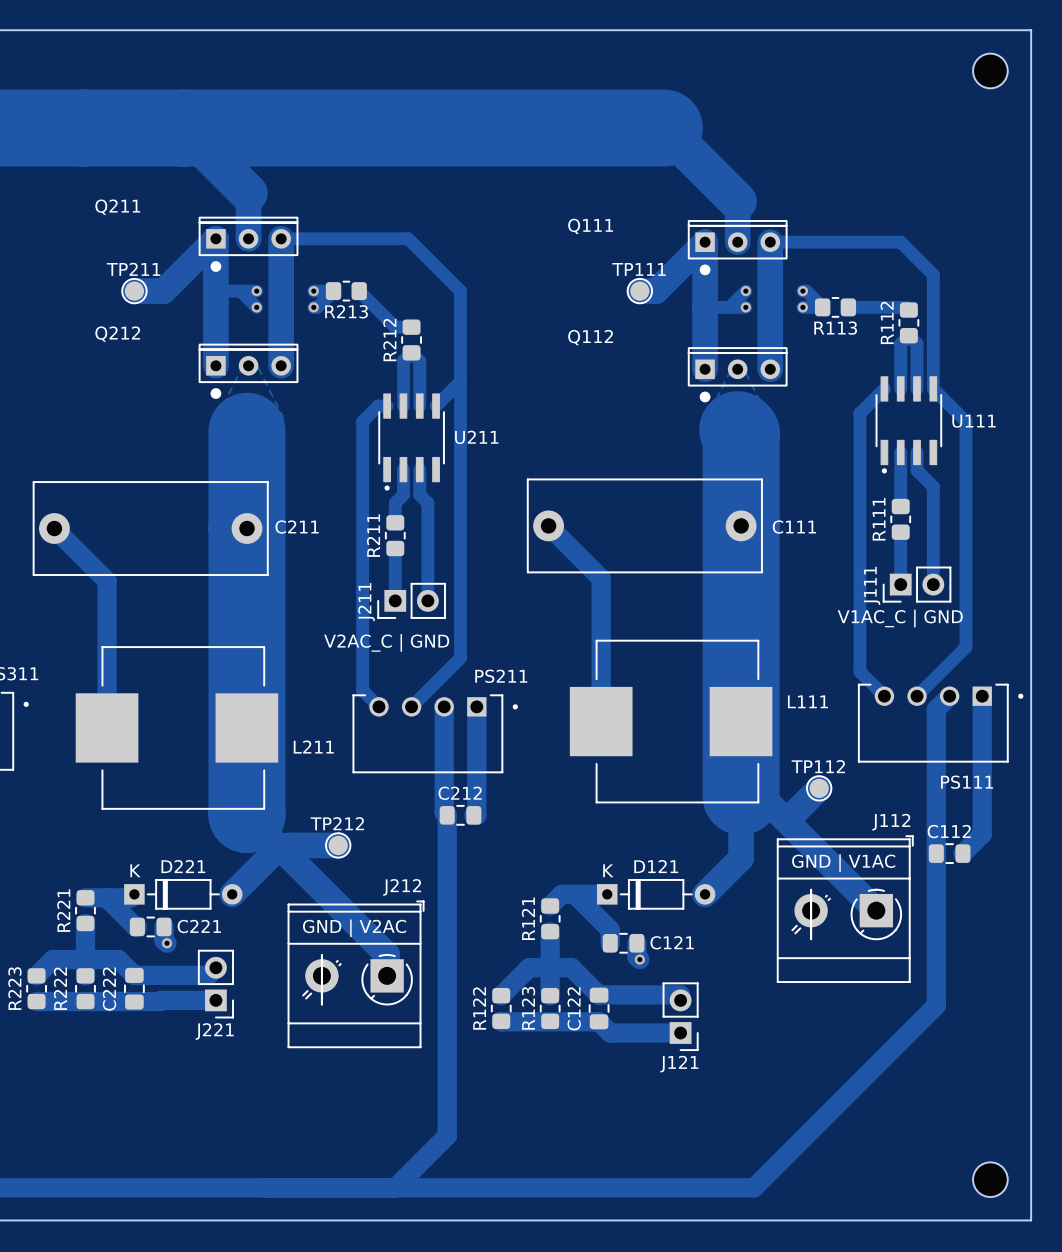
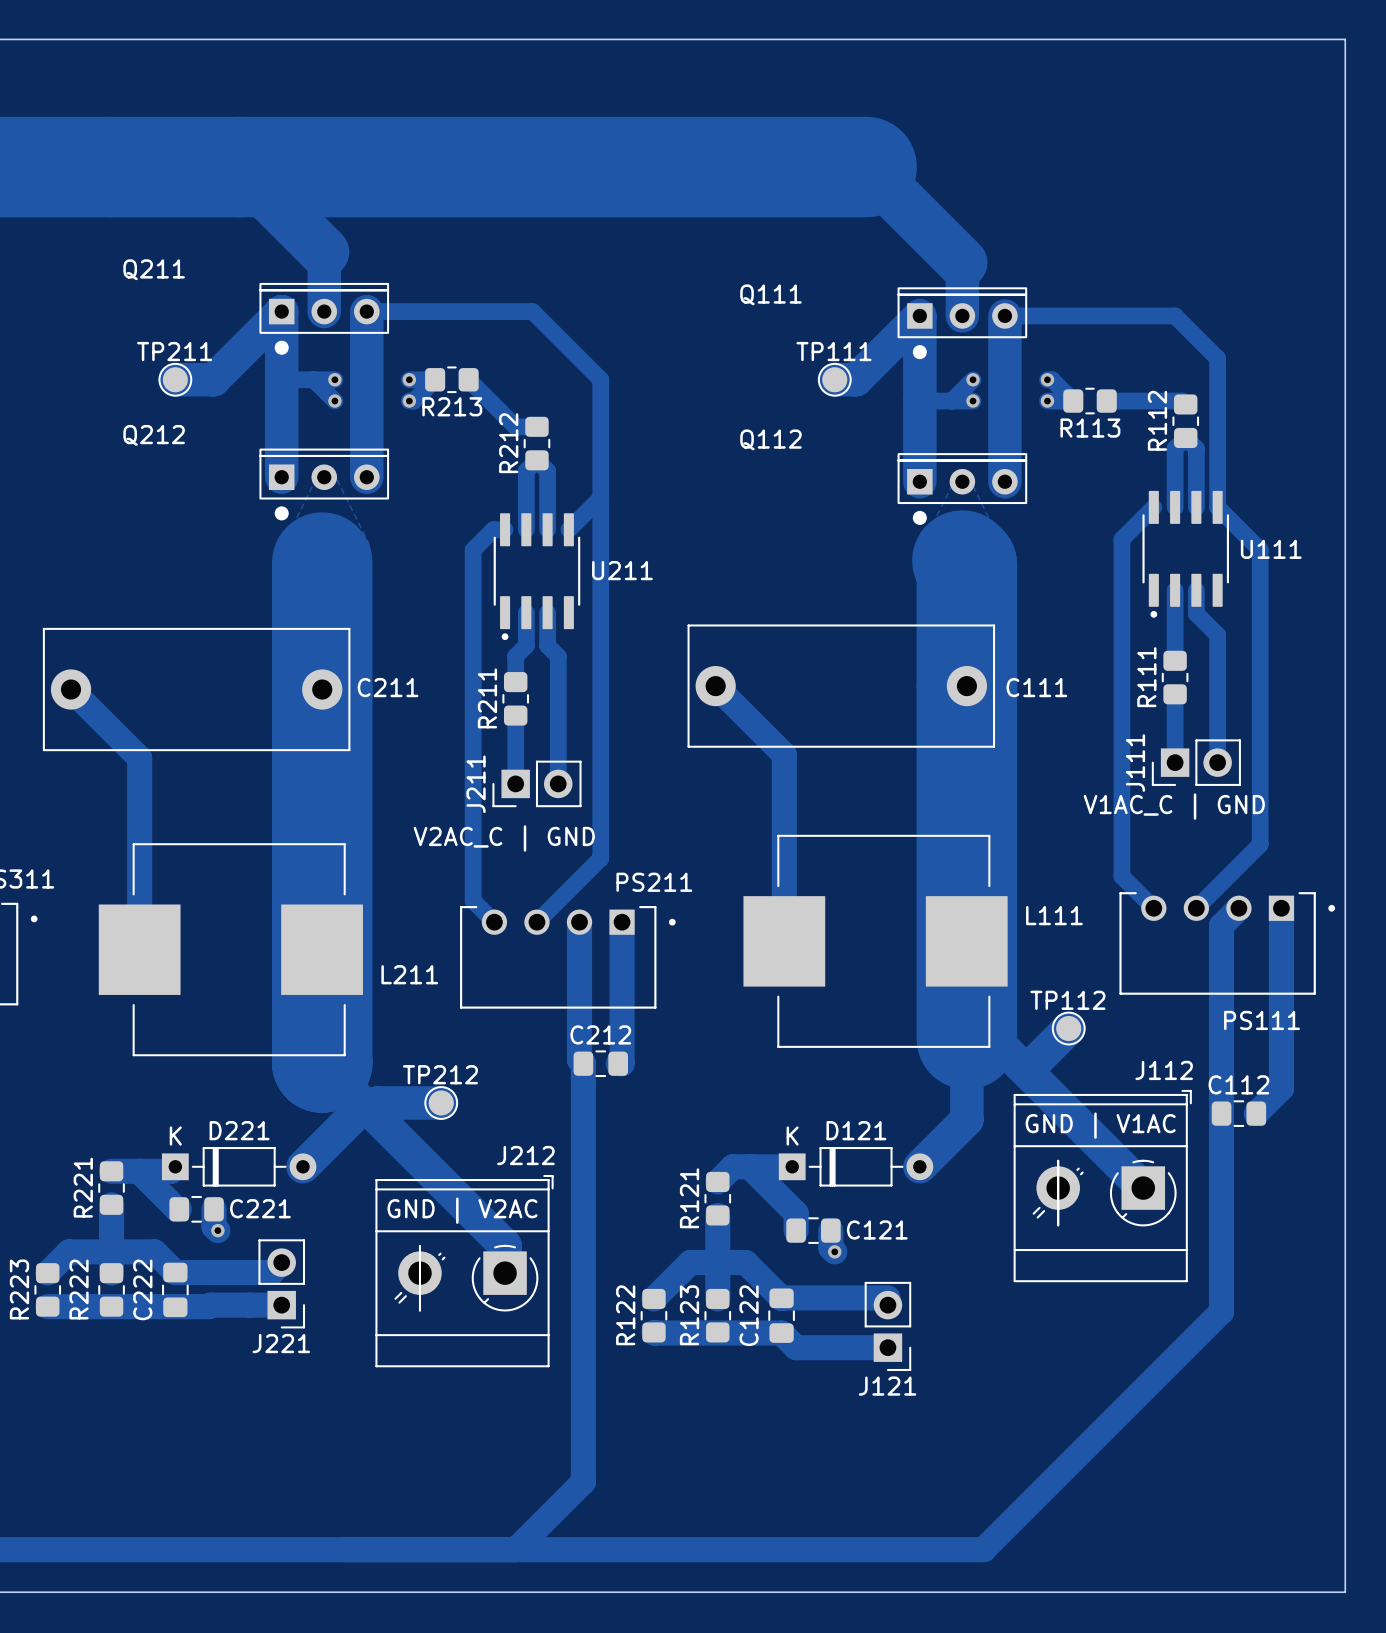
part: (990, 70) -> none
part: (990, 1179) -> none

